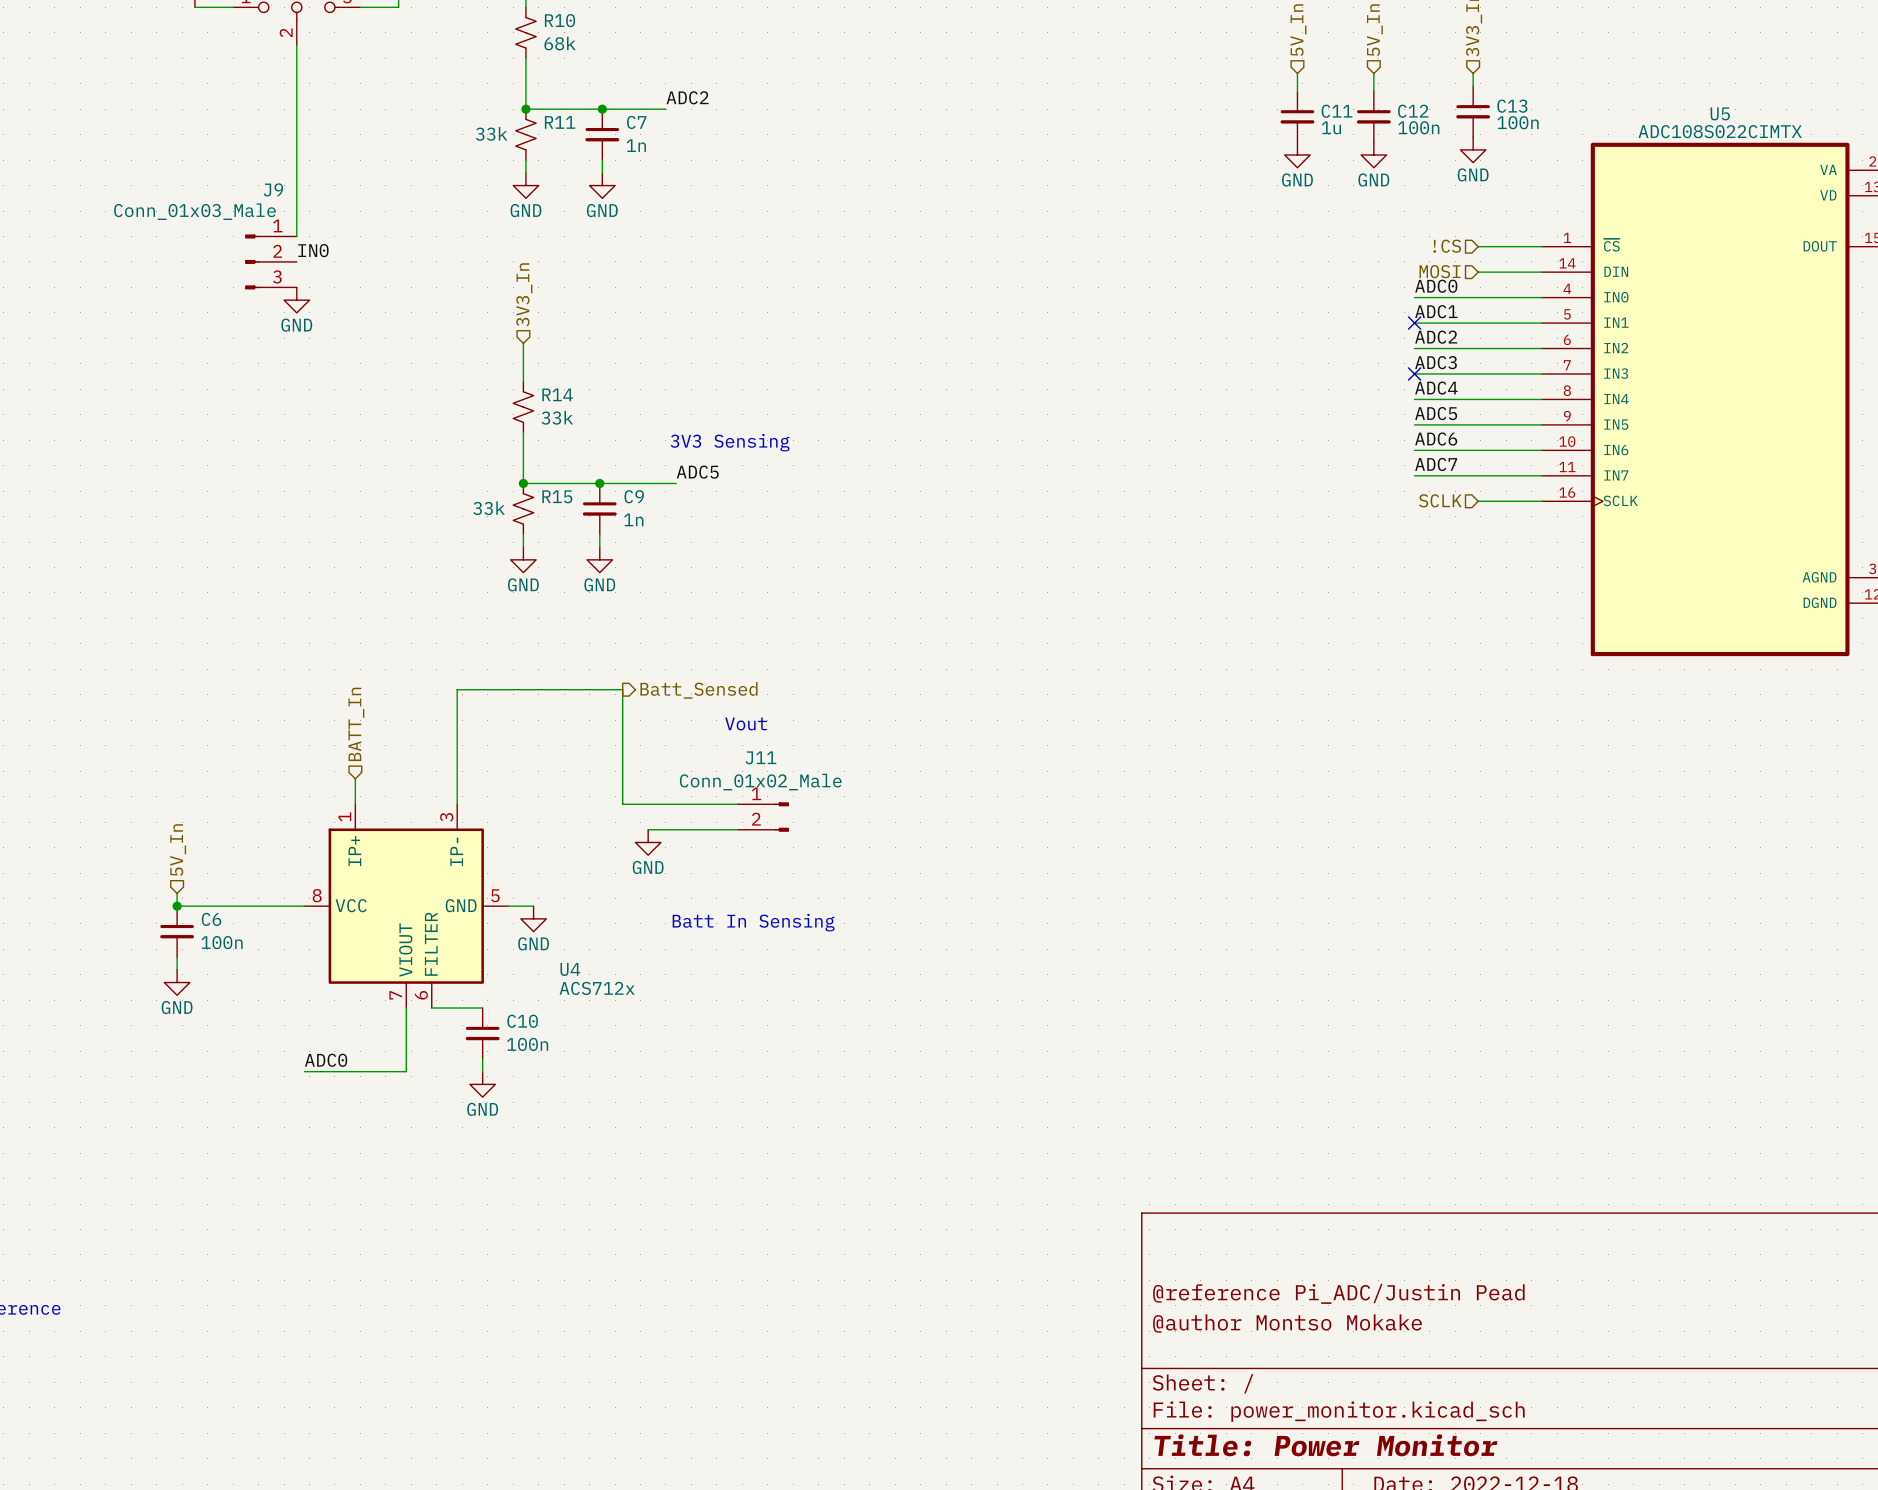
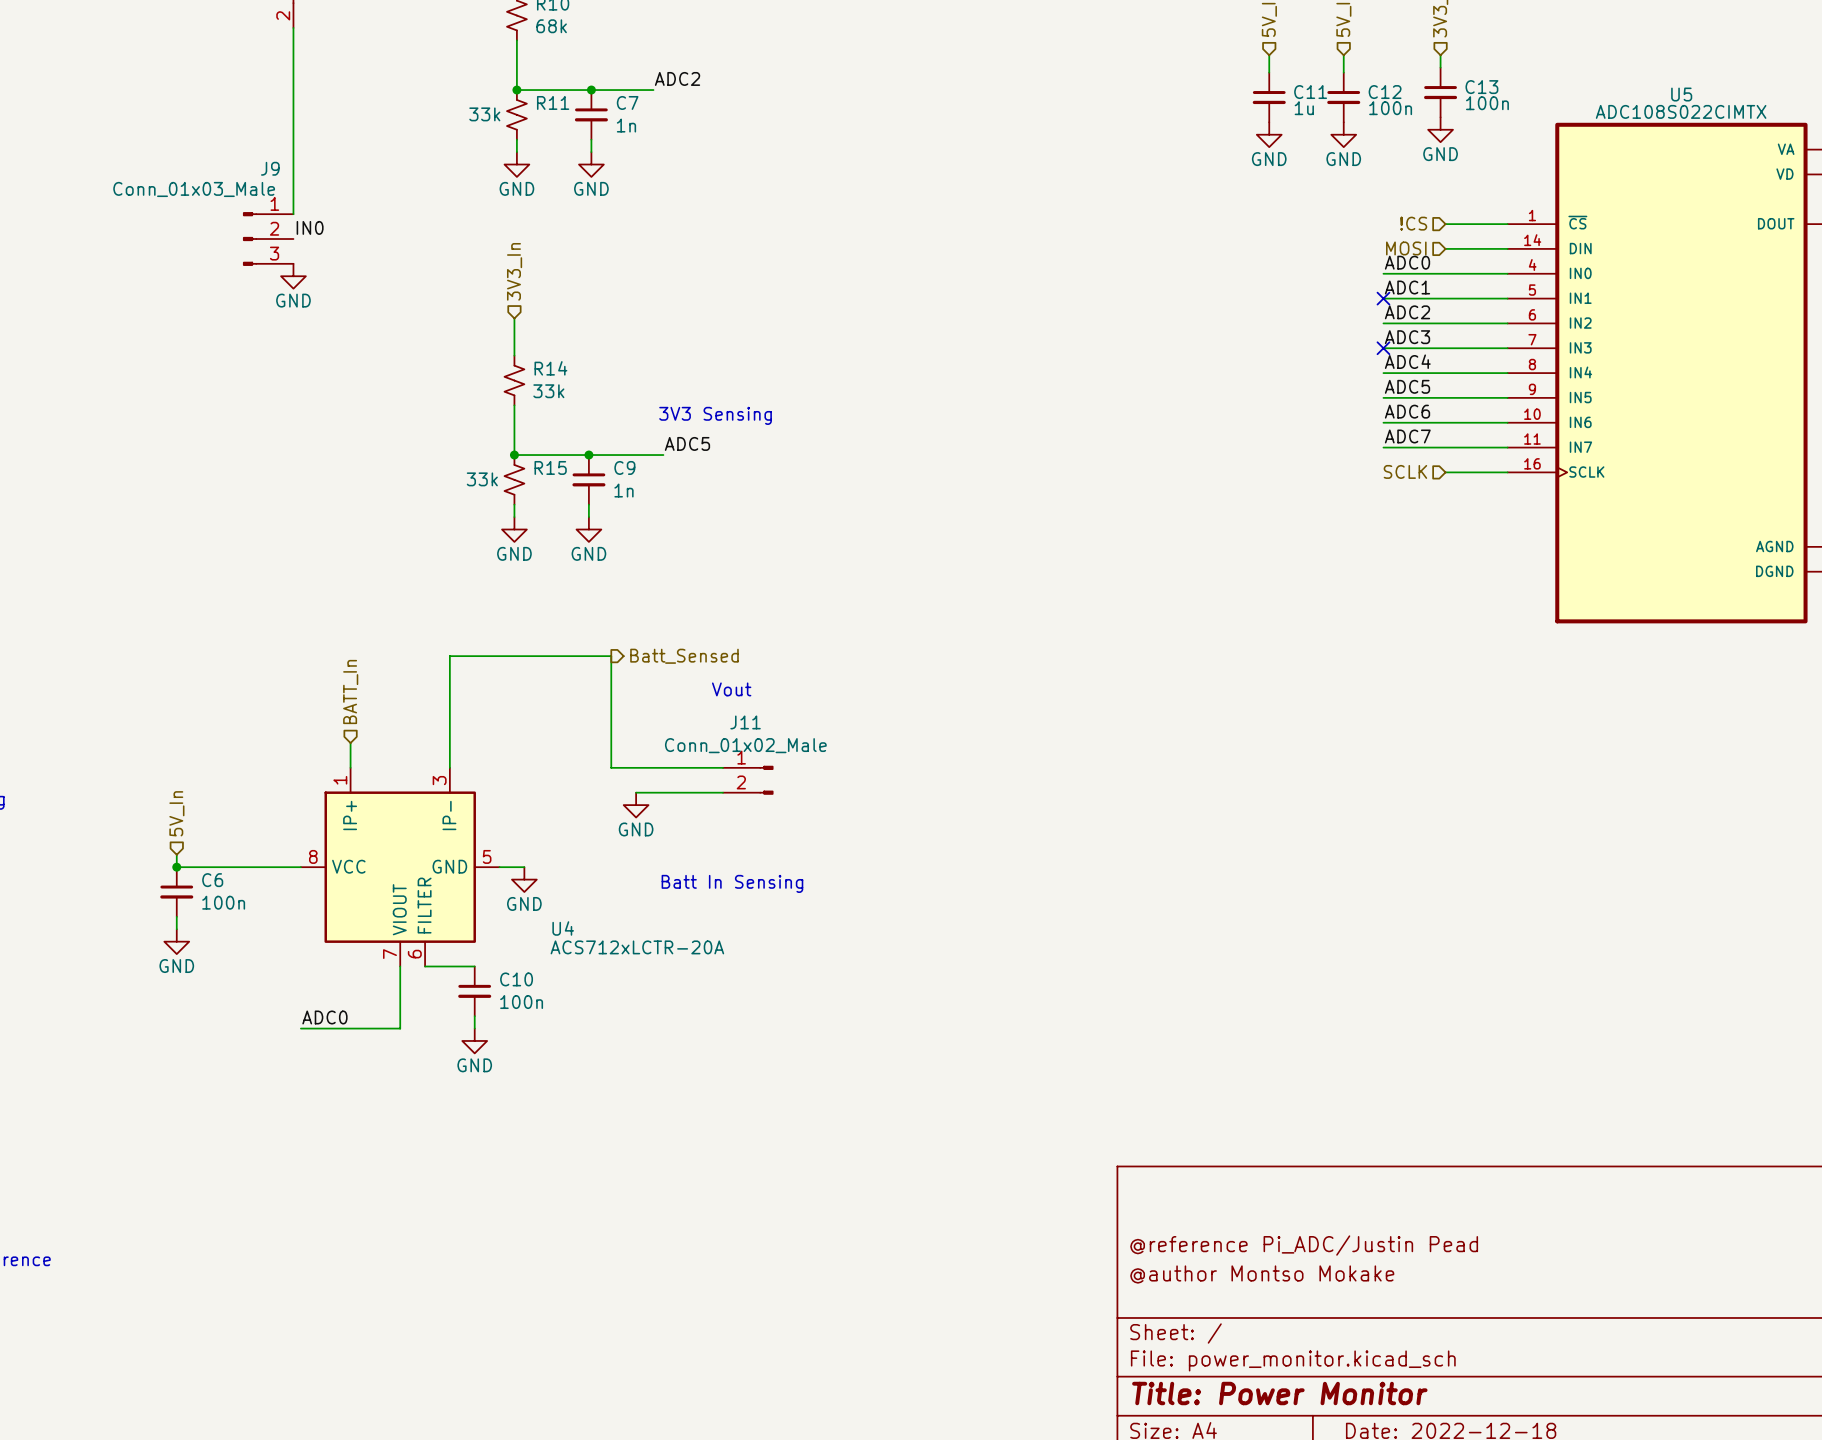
U4 value: ACS712x (597, 988) -> ACS712xLCTR-20A (637, 947)

